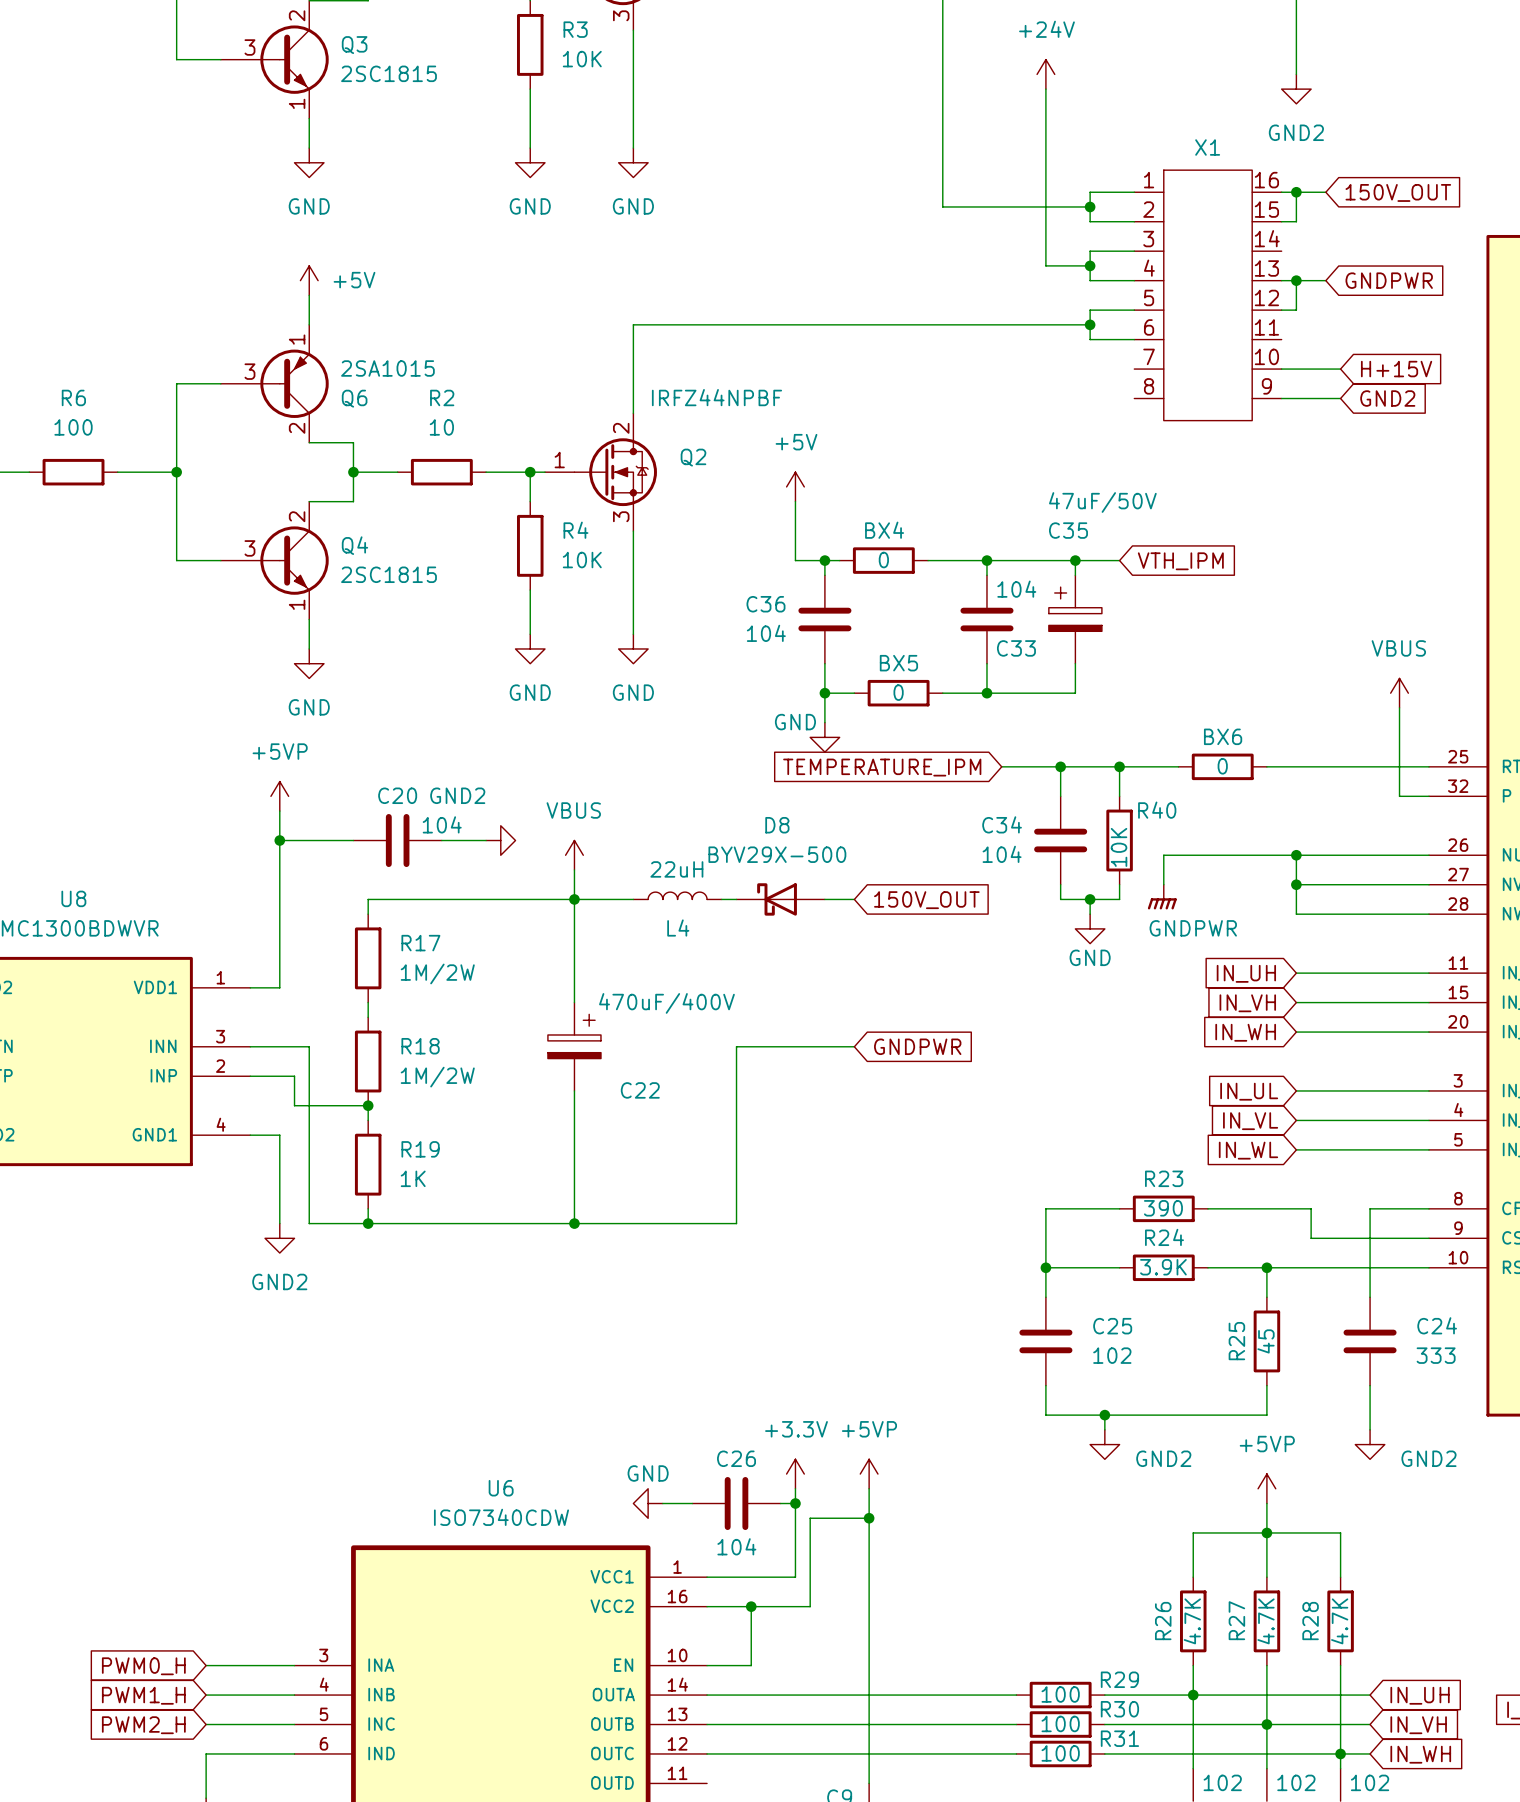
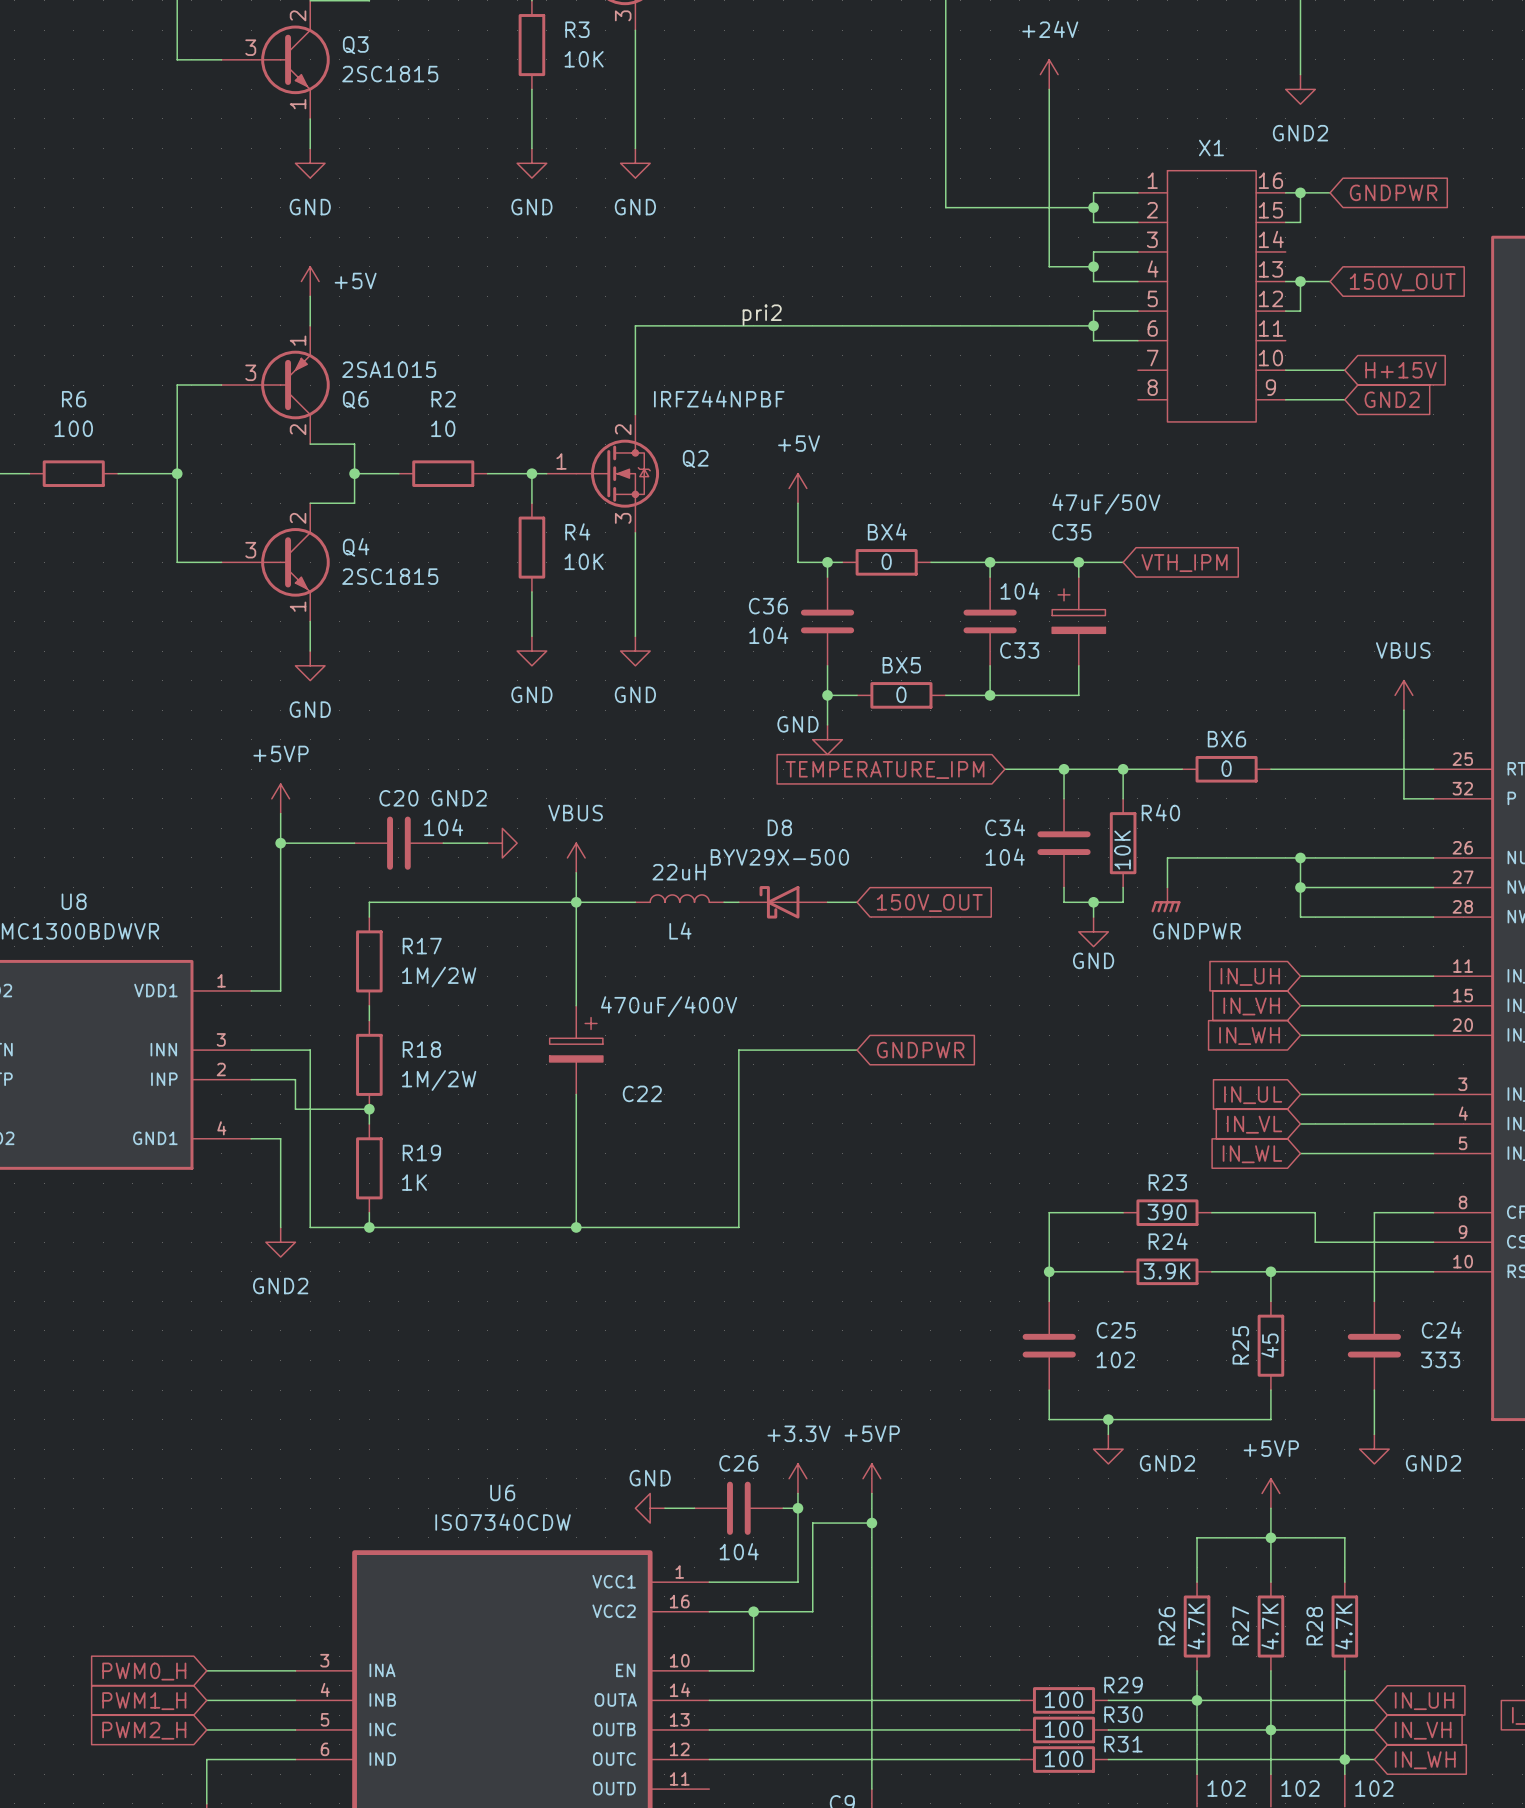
global label: 150V_OUT (1398, 192) -> GNDPWR (1393, 192)
global label: GNDPWR (1389, 280) -> 150V_OUT (1402, 282)
label: none -> pri2 (762, 315)

